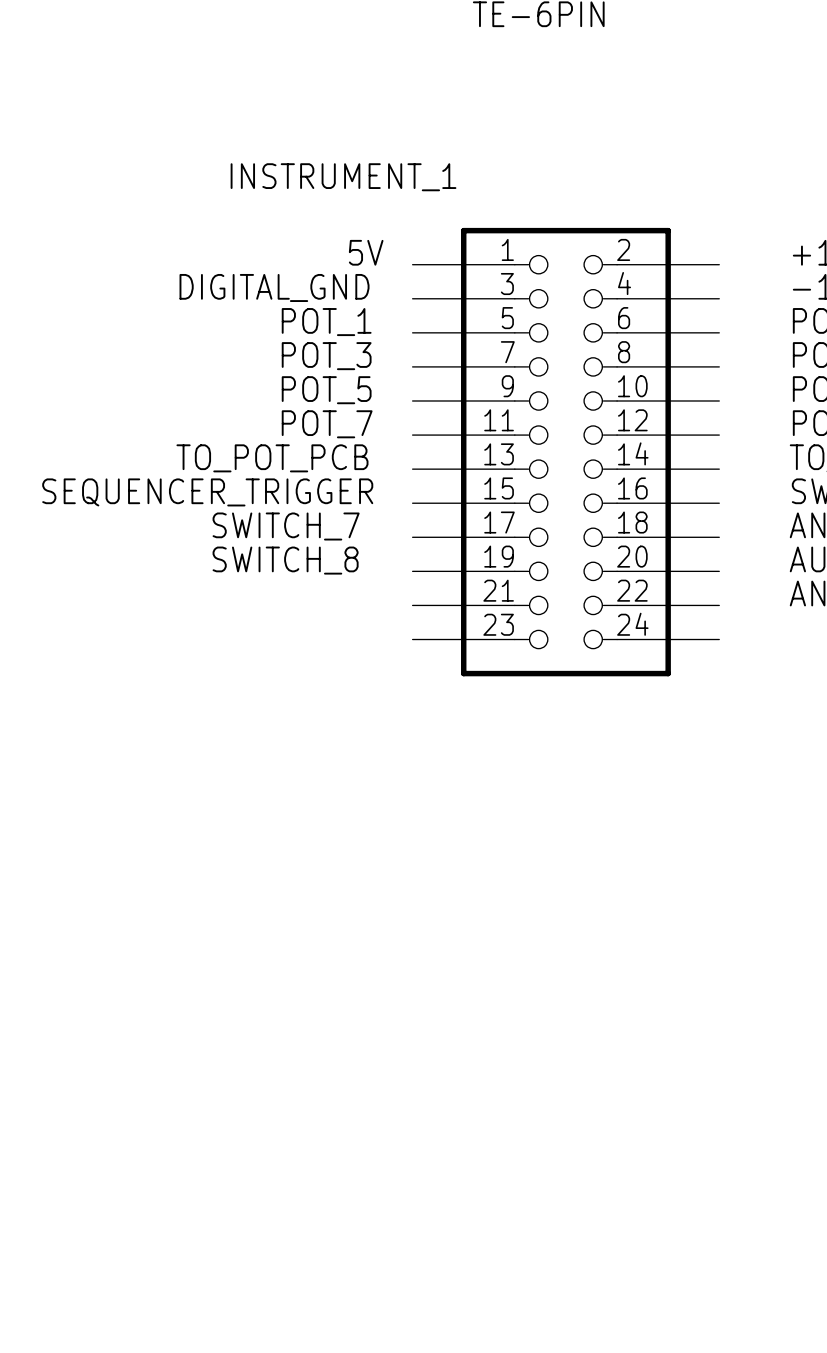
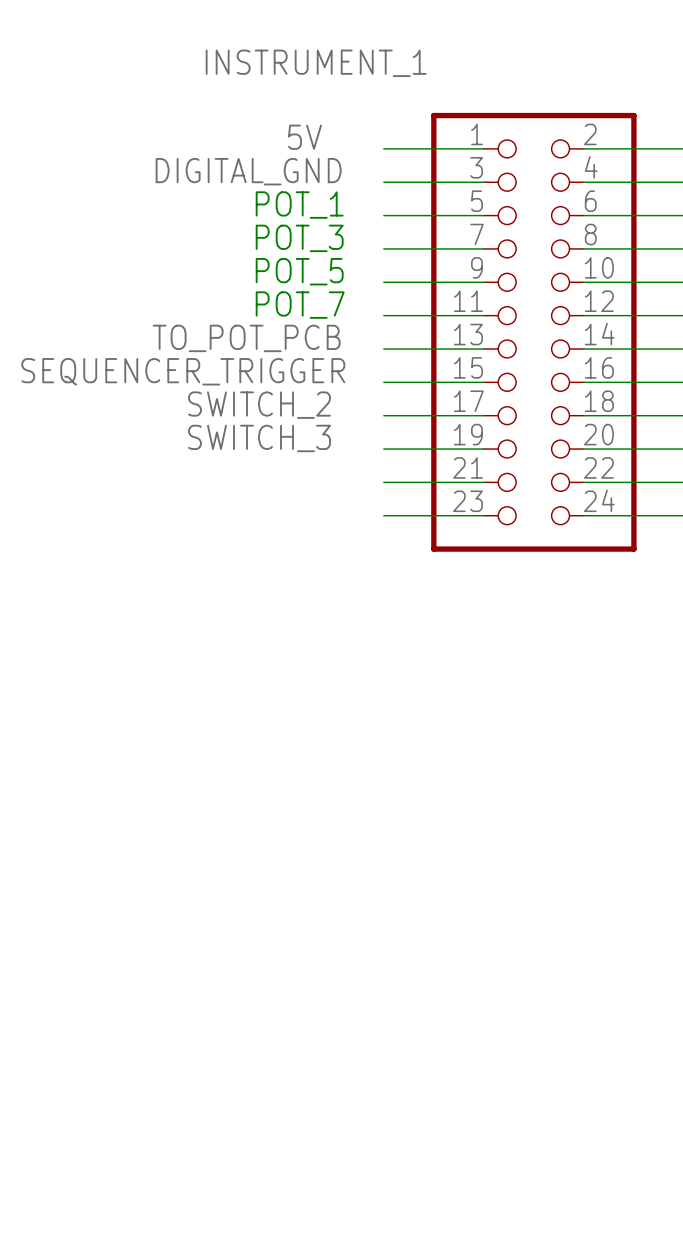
label position: 5V (366, 252) -> 5V (305, 137)
label: SWITCH_7 (286, 526) -> SWITCH_2 (259, 405)
label: SWITCH_8 (285, 560) -> SWITCH_3 (259, 438)

